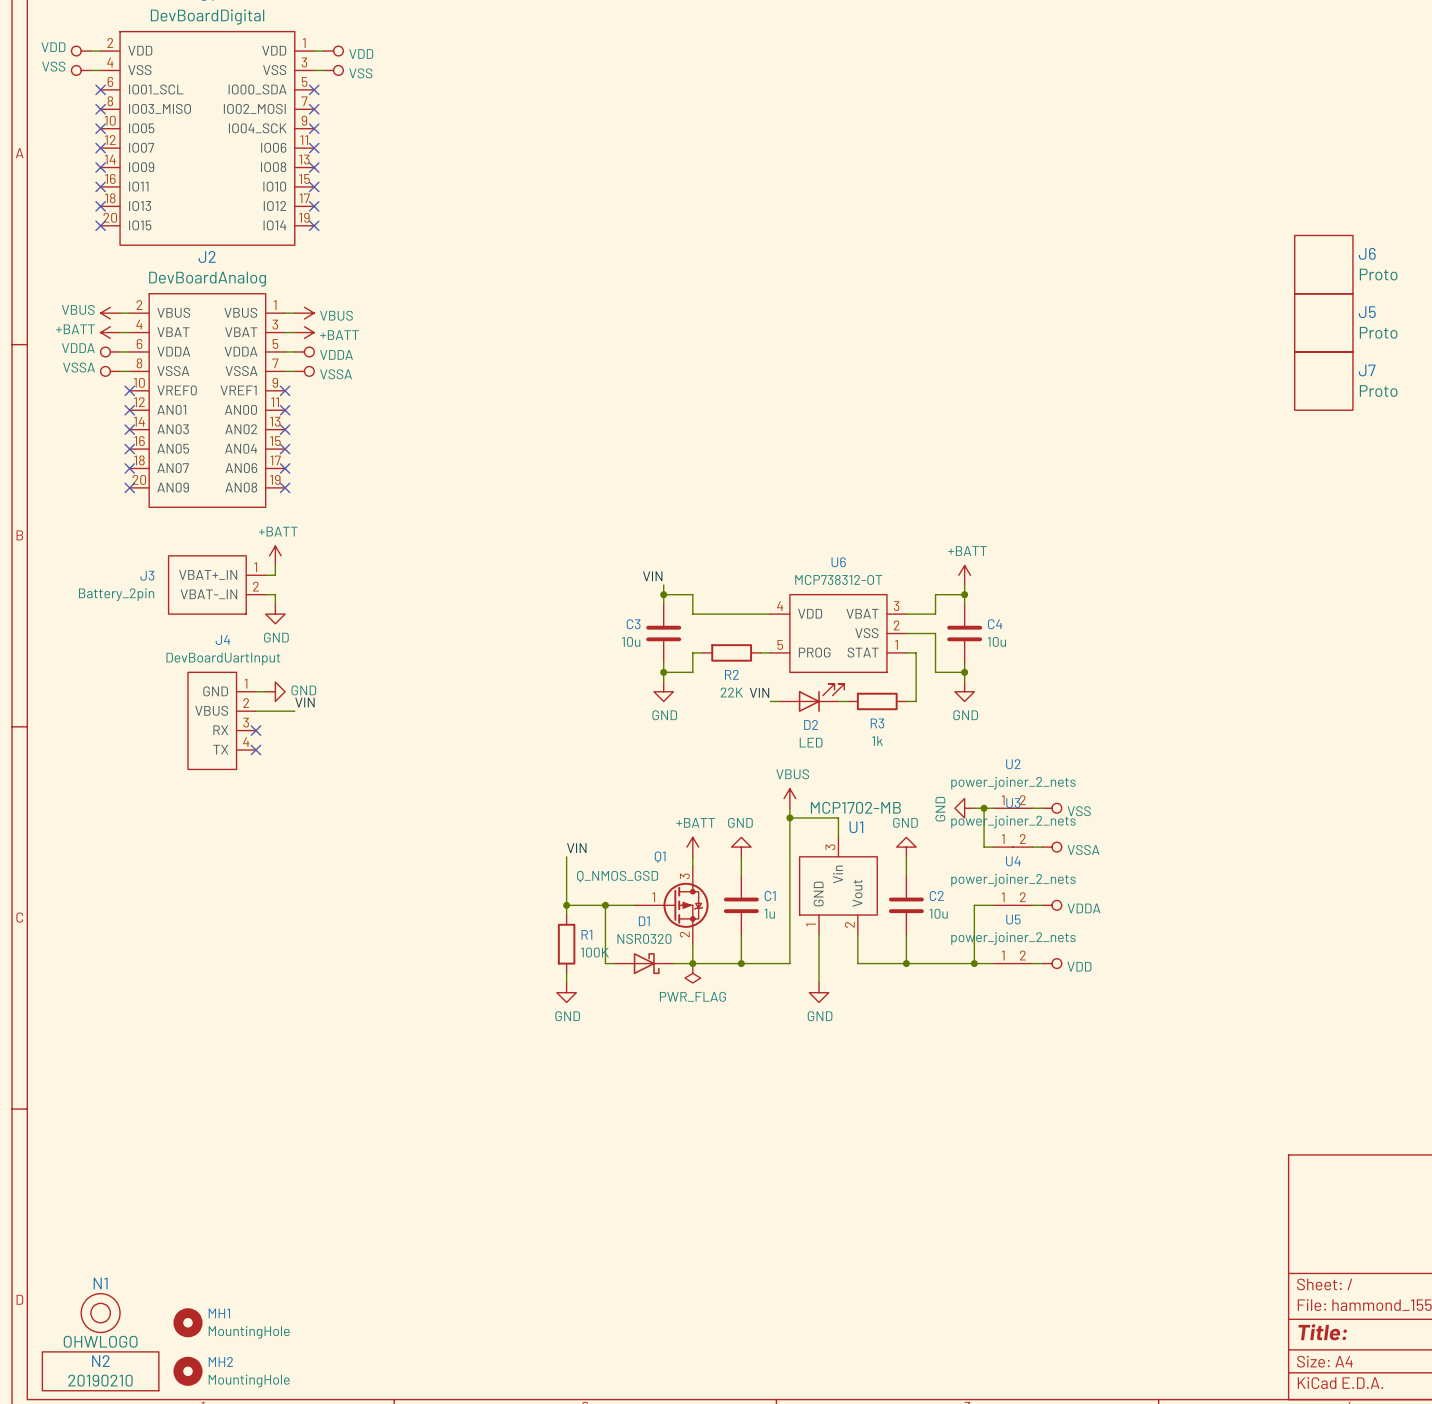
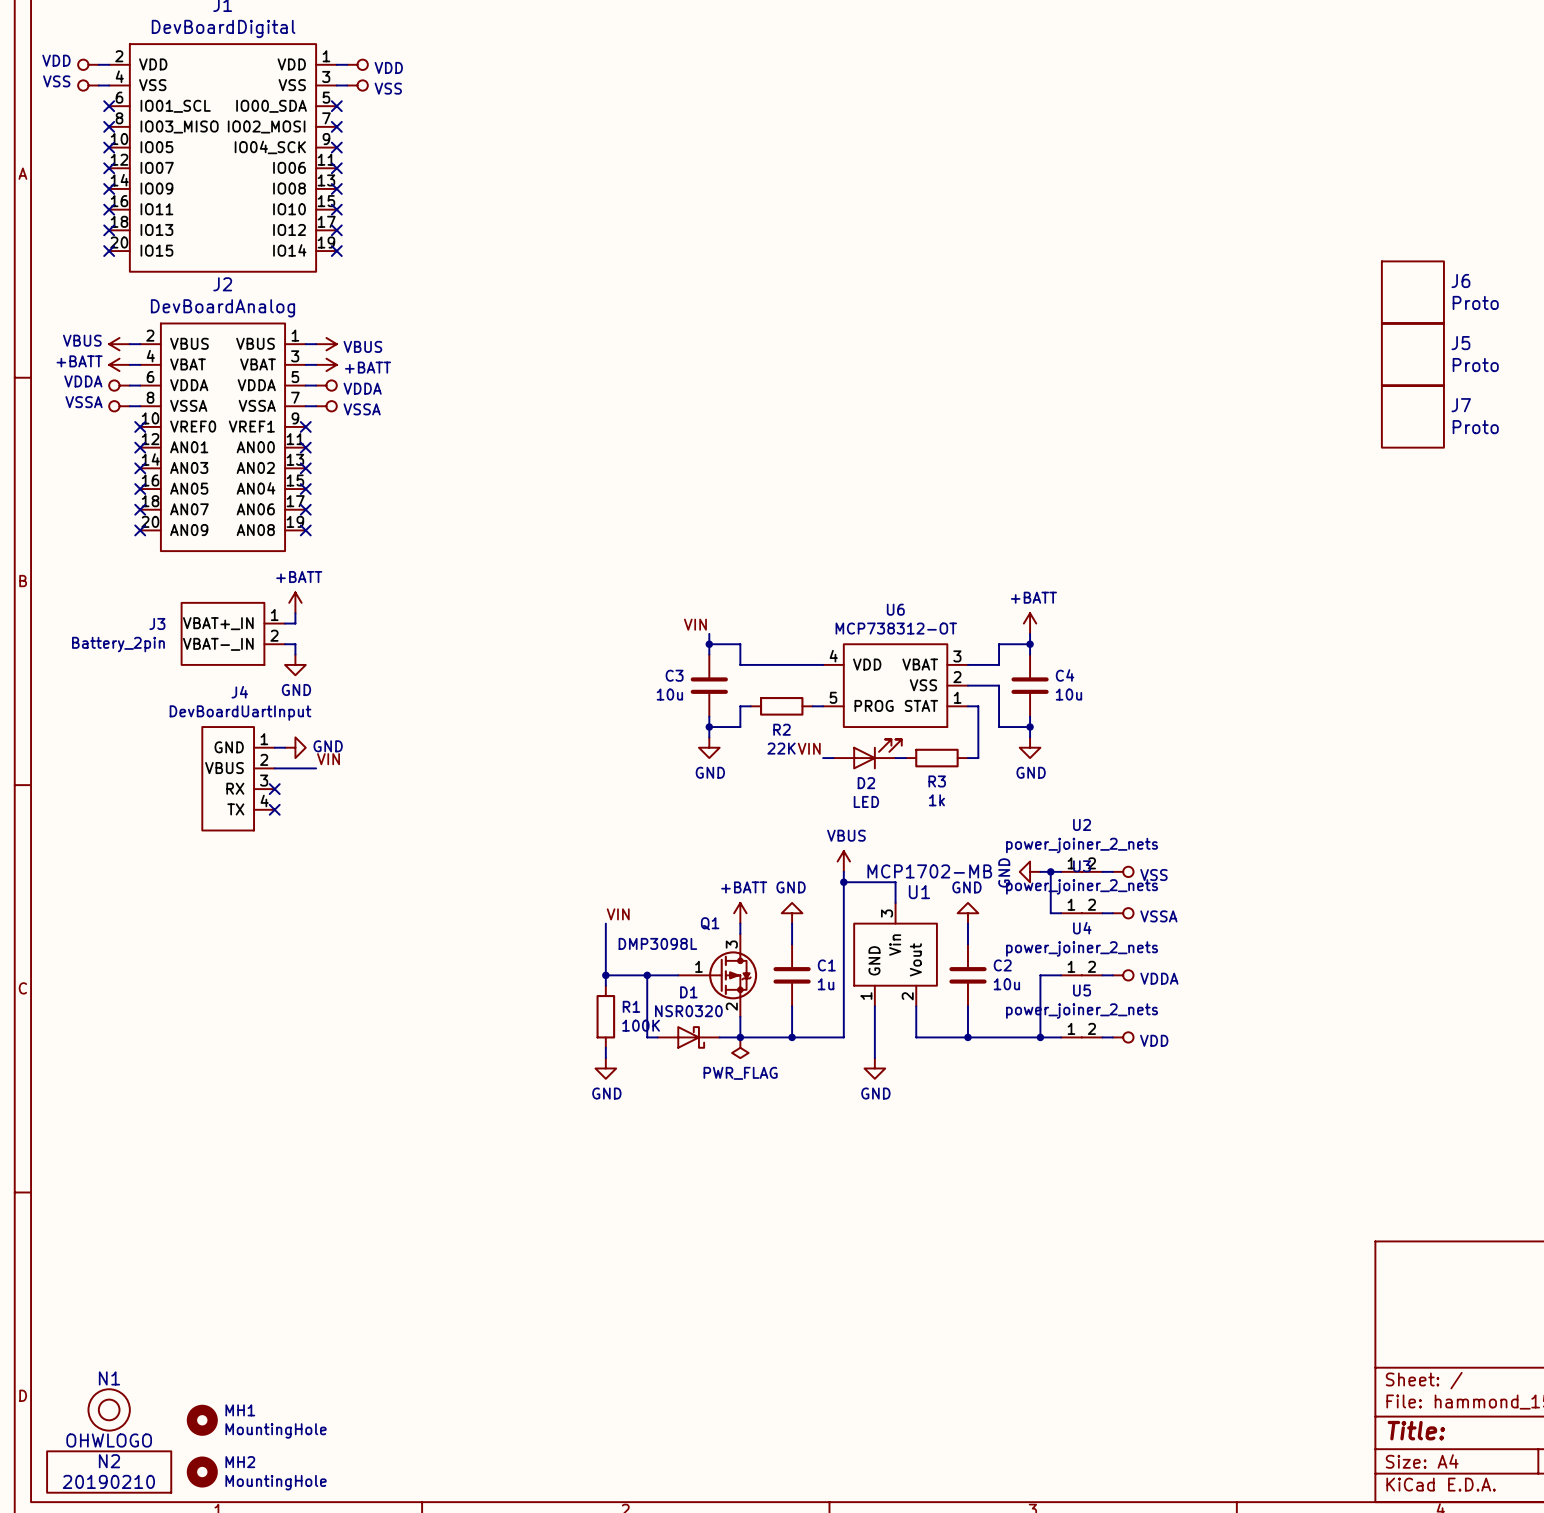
Q1 value: Q_NMOS_GSD (617, 876) -> DMP3098L (657, 943)

